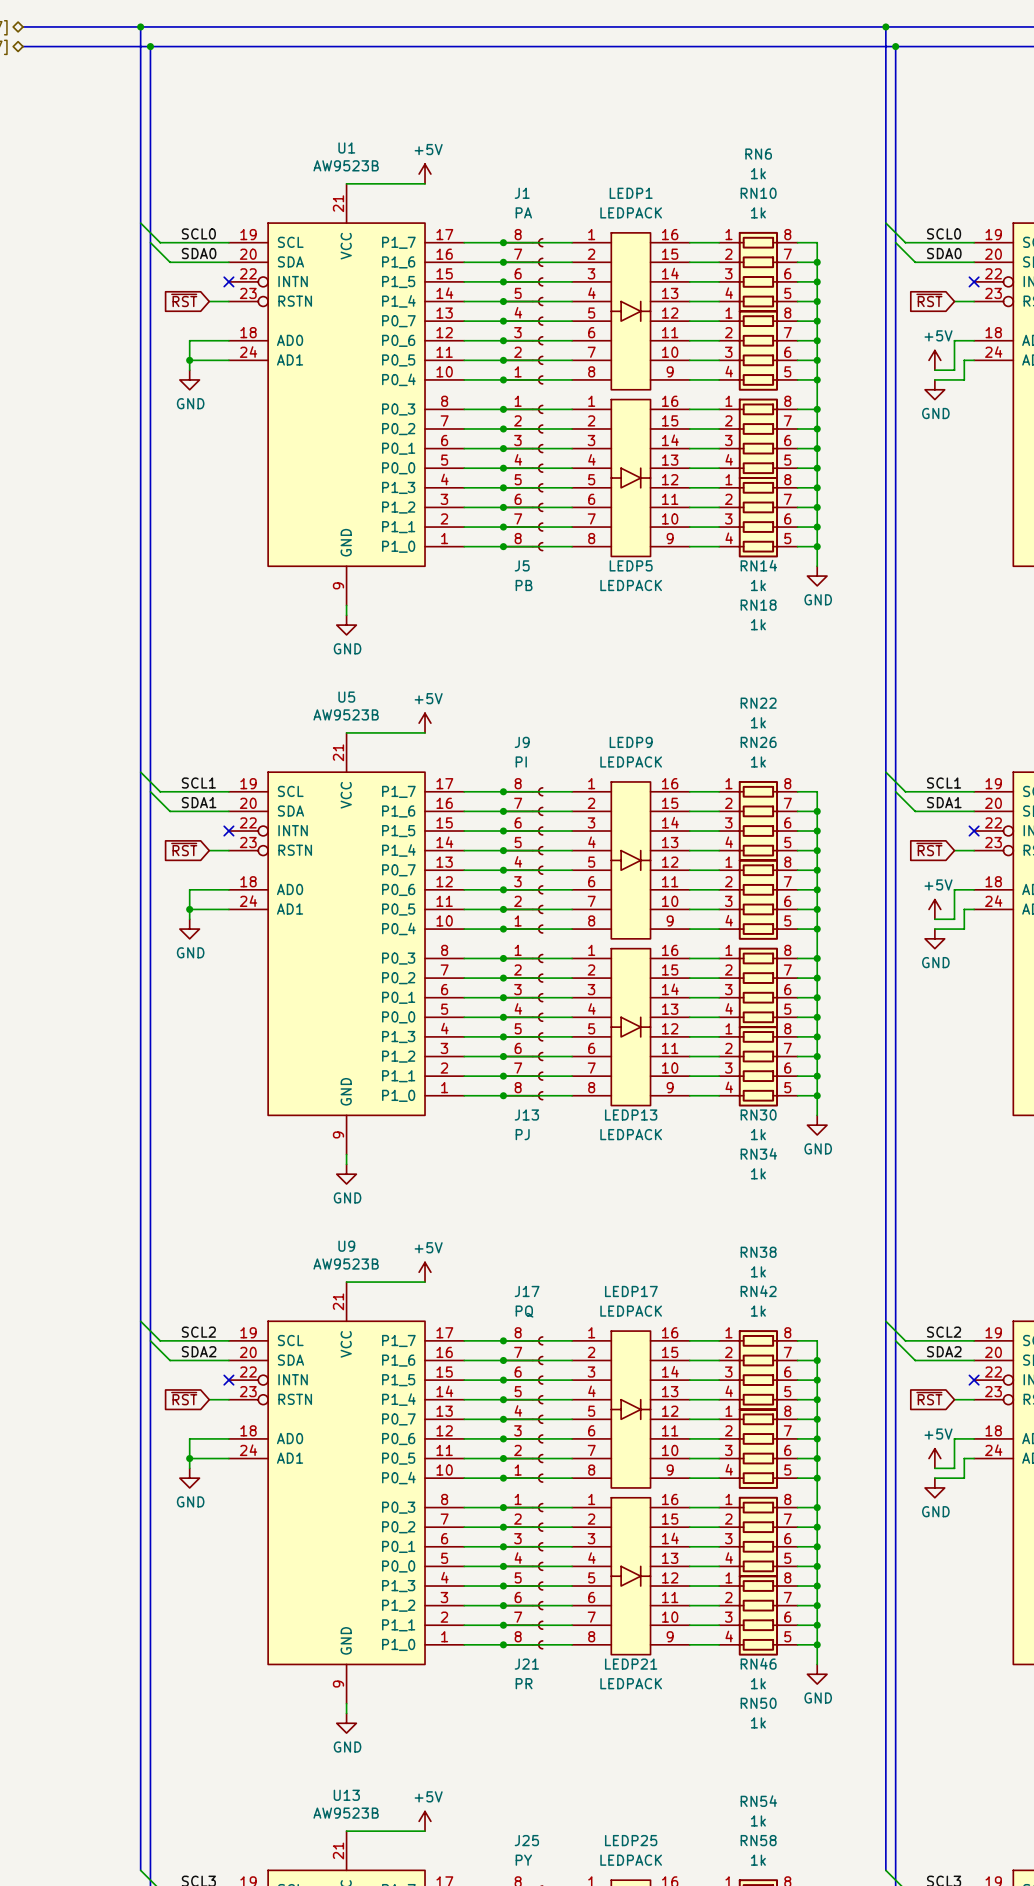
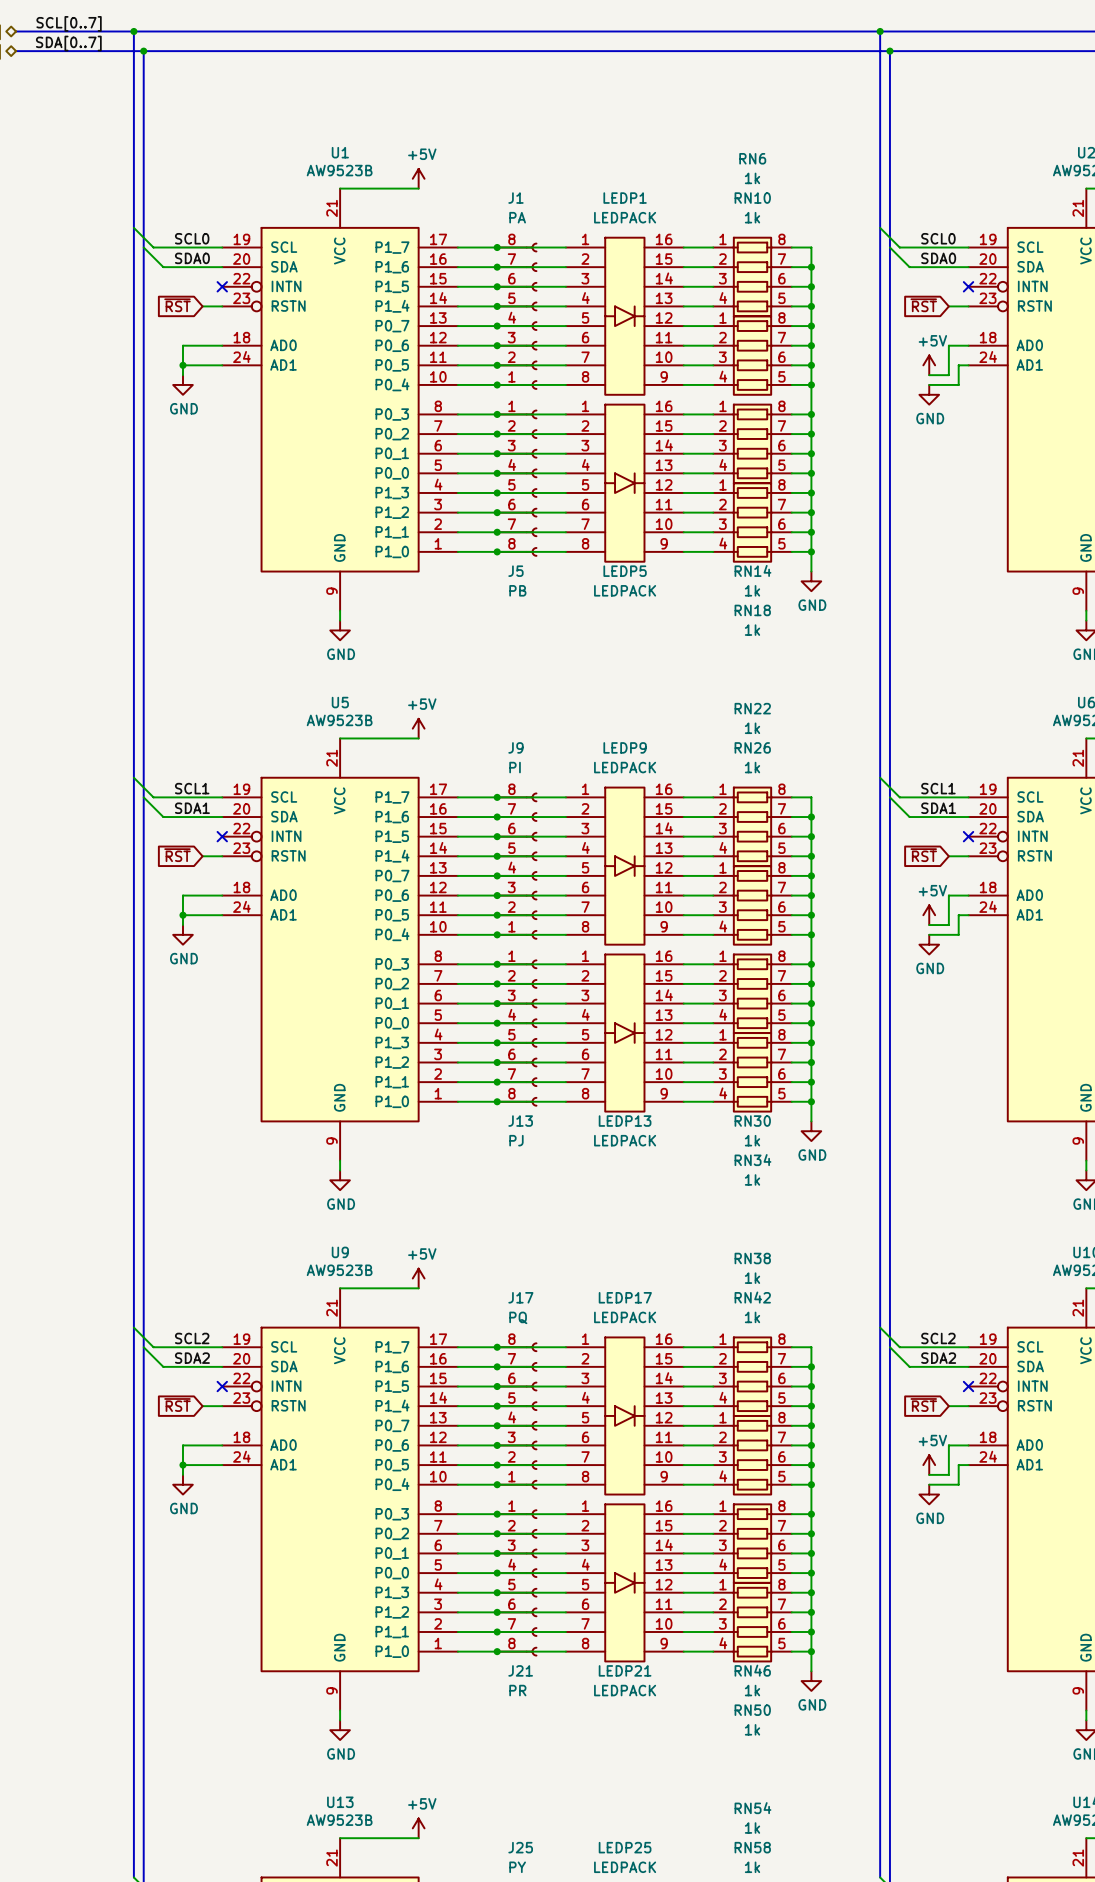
label: none -> SCL[0..7] (69, 23)
label: none -> SDA[0..7] (68, 43)

